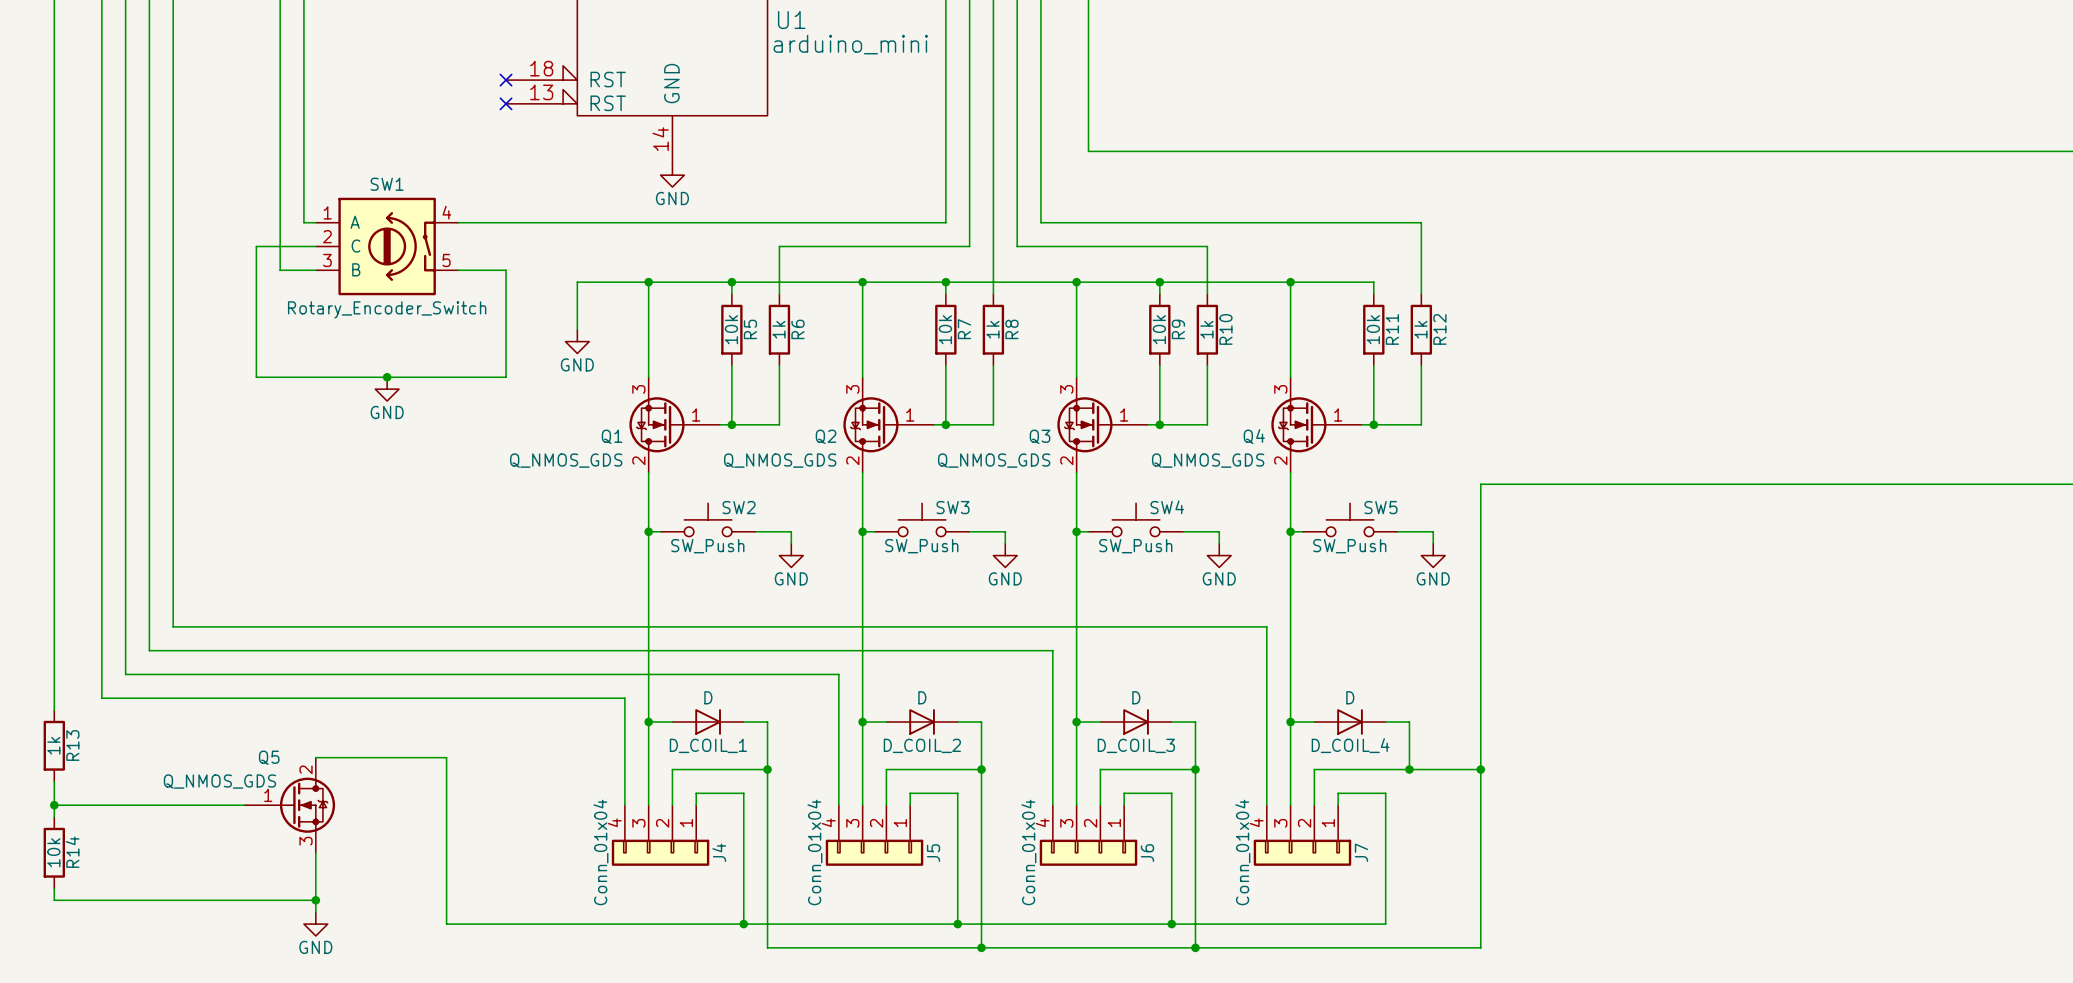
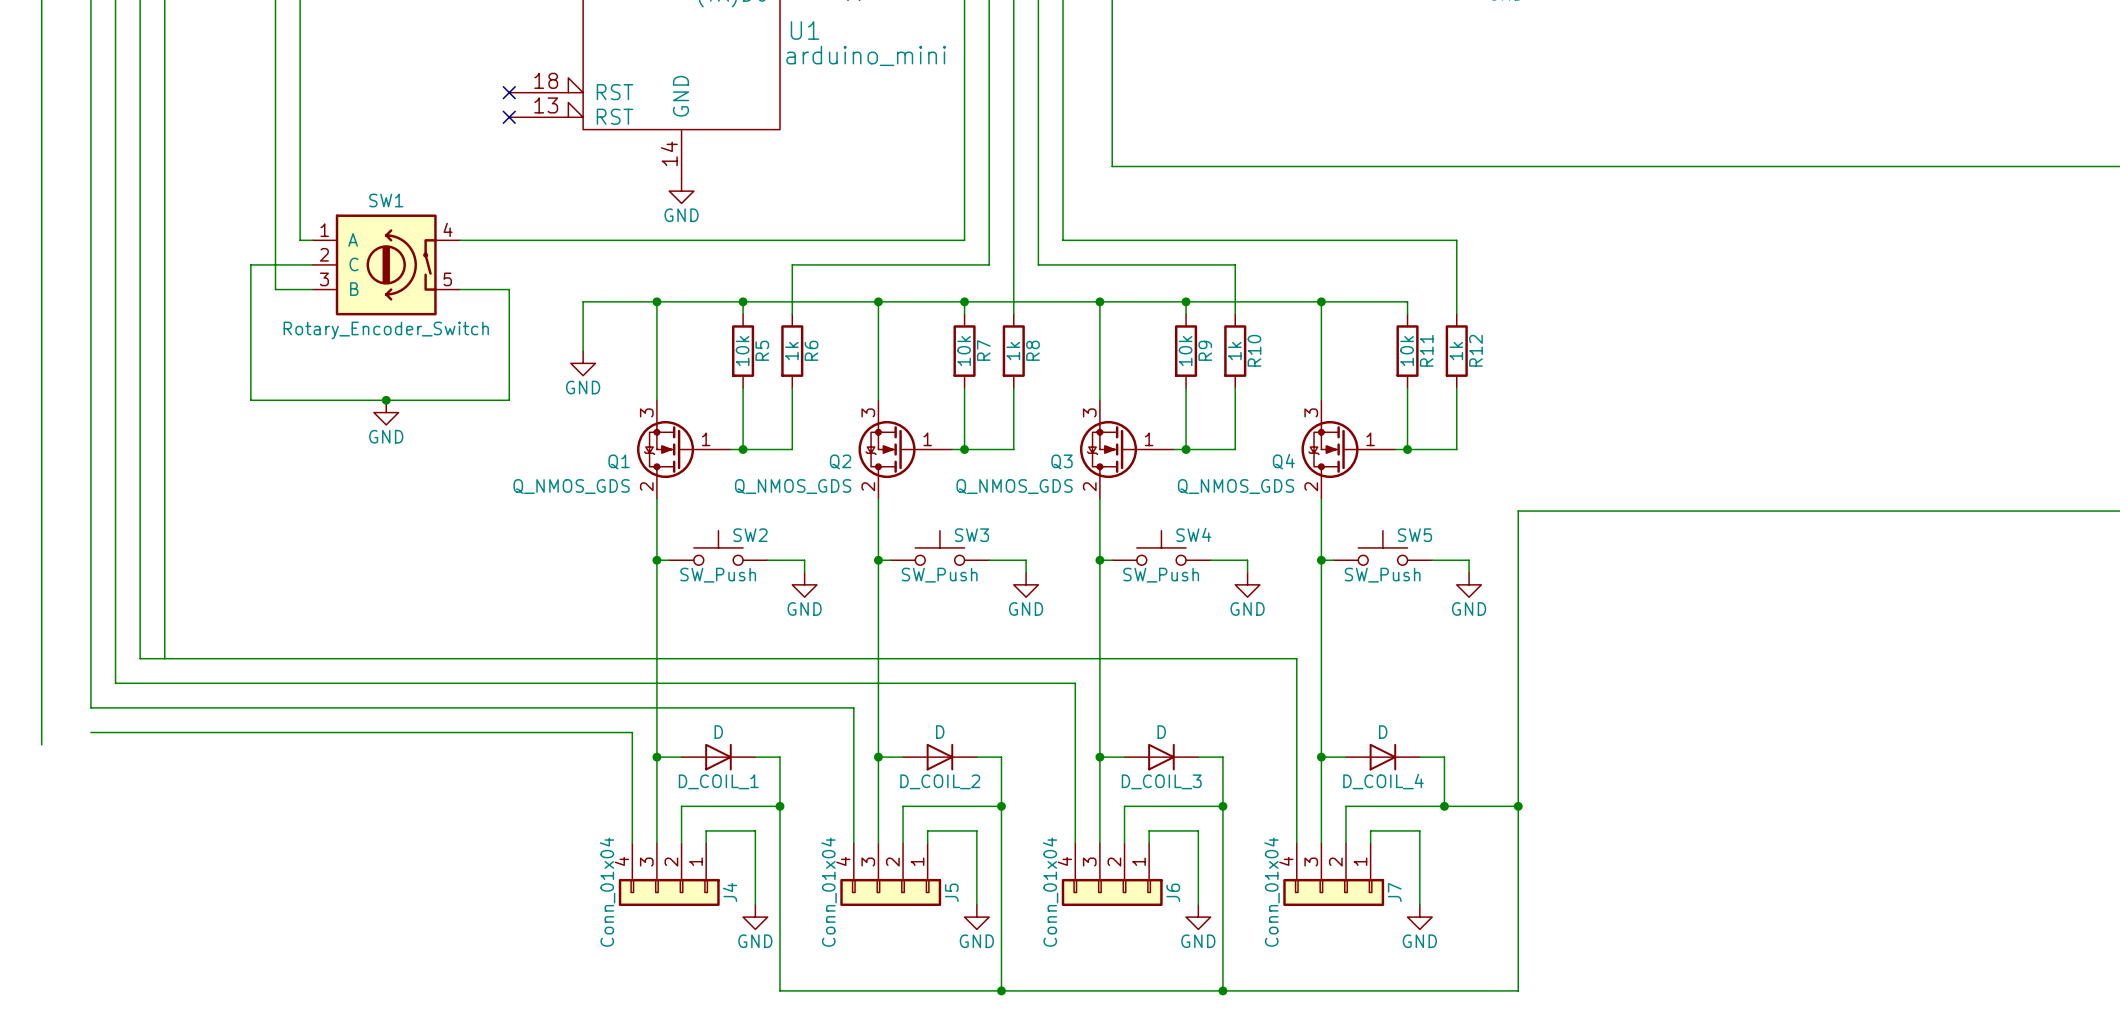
wire: (149, 626) (149, 650) -> (140, 658) (164, 658)
wire: (125, 650) (125, 674) -> (115, 683) (140, 683)
wire: (101, 674) (101, 698) -> (90, 707) (115, 707)
R13: 1k (54, 745) -> none
wire: (315, 757) (446, 757) (446, 924) (1385, 924) (1385, 864) -> none
wire: (54, 781) (54, 817) -> none
wire: (54, 805) (244, 805) -> none
junction: (54, 805) -> none
Q5: Q_NMOS_GDS (289, 805) -> none
R14: 10k (54, 852) -> none
wire: (315, 852) (315, 912) -> none
wire: (743, 864) (743, 924) -> none
wire: (957, 864) (957, 924) -> none
wire: (1171, 864) (1171, 924) -> none
power symbol: none -> GND (755, 917)
power symbol: none -> GND (976, 917)
power symbol: none -> GND (1198, 917)
power symbol: none -> GND (1419, 917)
wire: (54, 888) (54, 900) (315, 900) -> none
junction: (315, 900) -> none
power symbol: GND (315, 924) -> none
junction: (743, 924) -> none
junction: (957, 924) -> none
junction: (1171, 924) -> none

